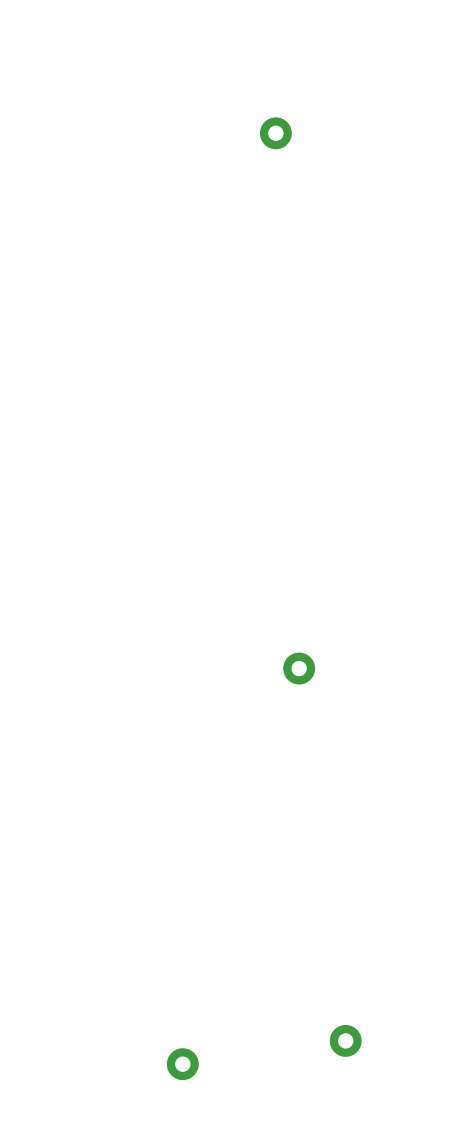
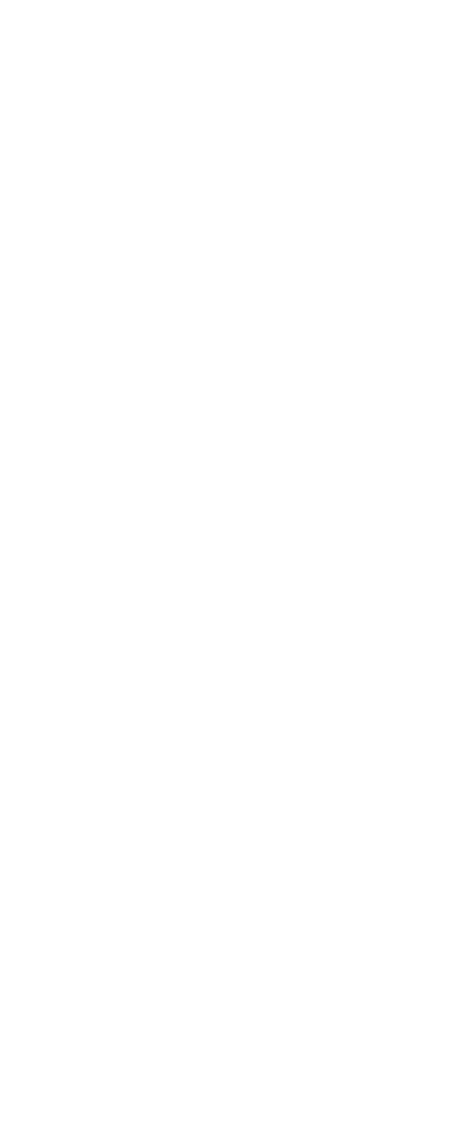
via: (275, 133) -> none
via: (299, 668) -> none
via: (345, 1040) -> none
via: (182, 1064) -> none

